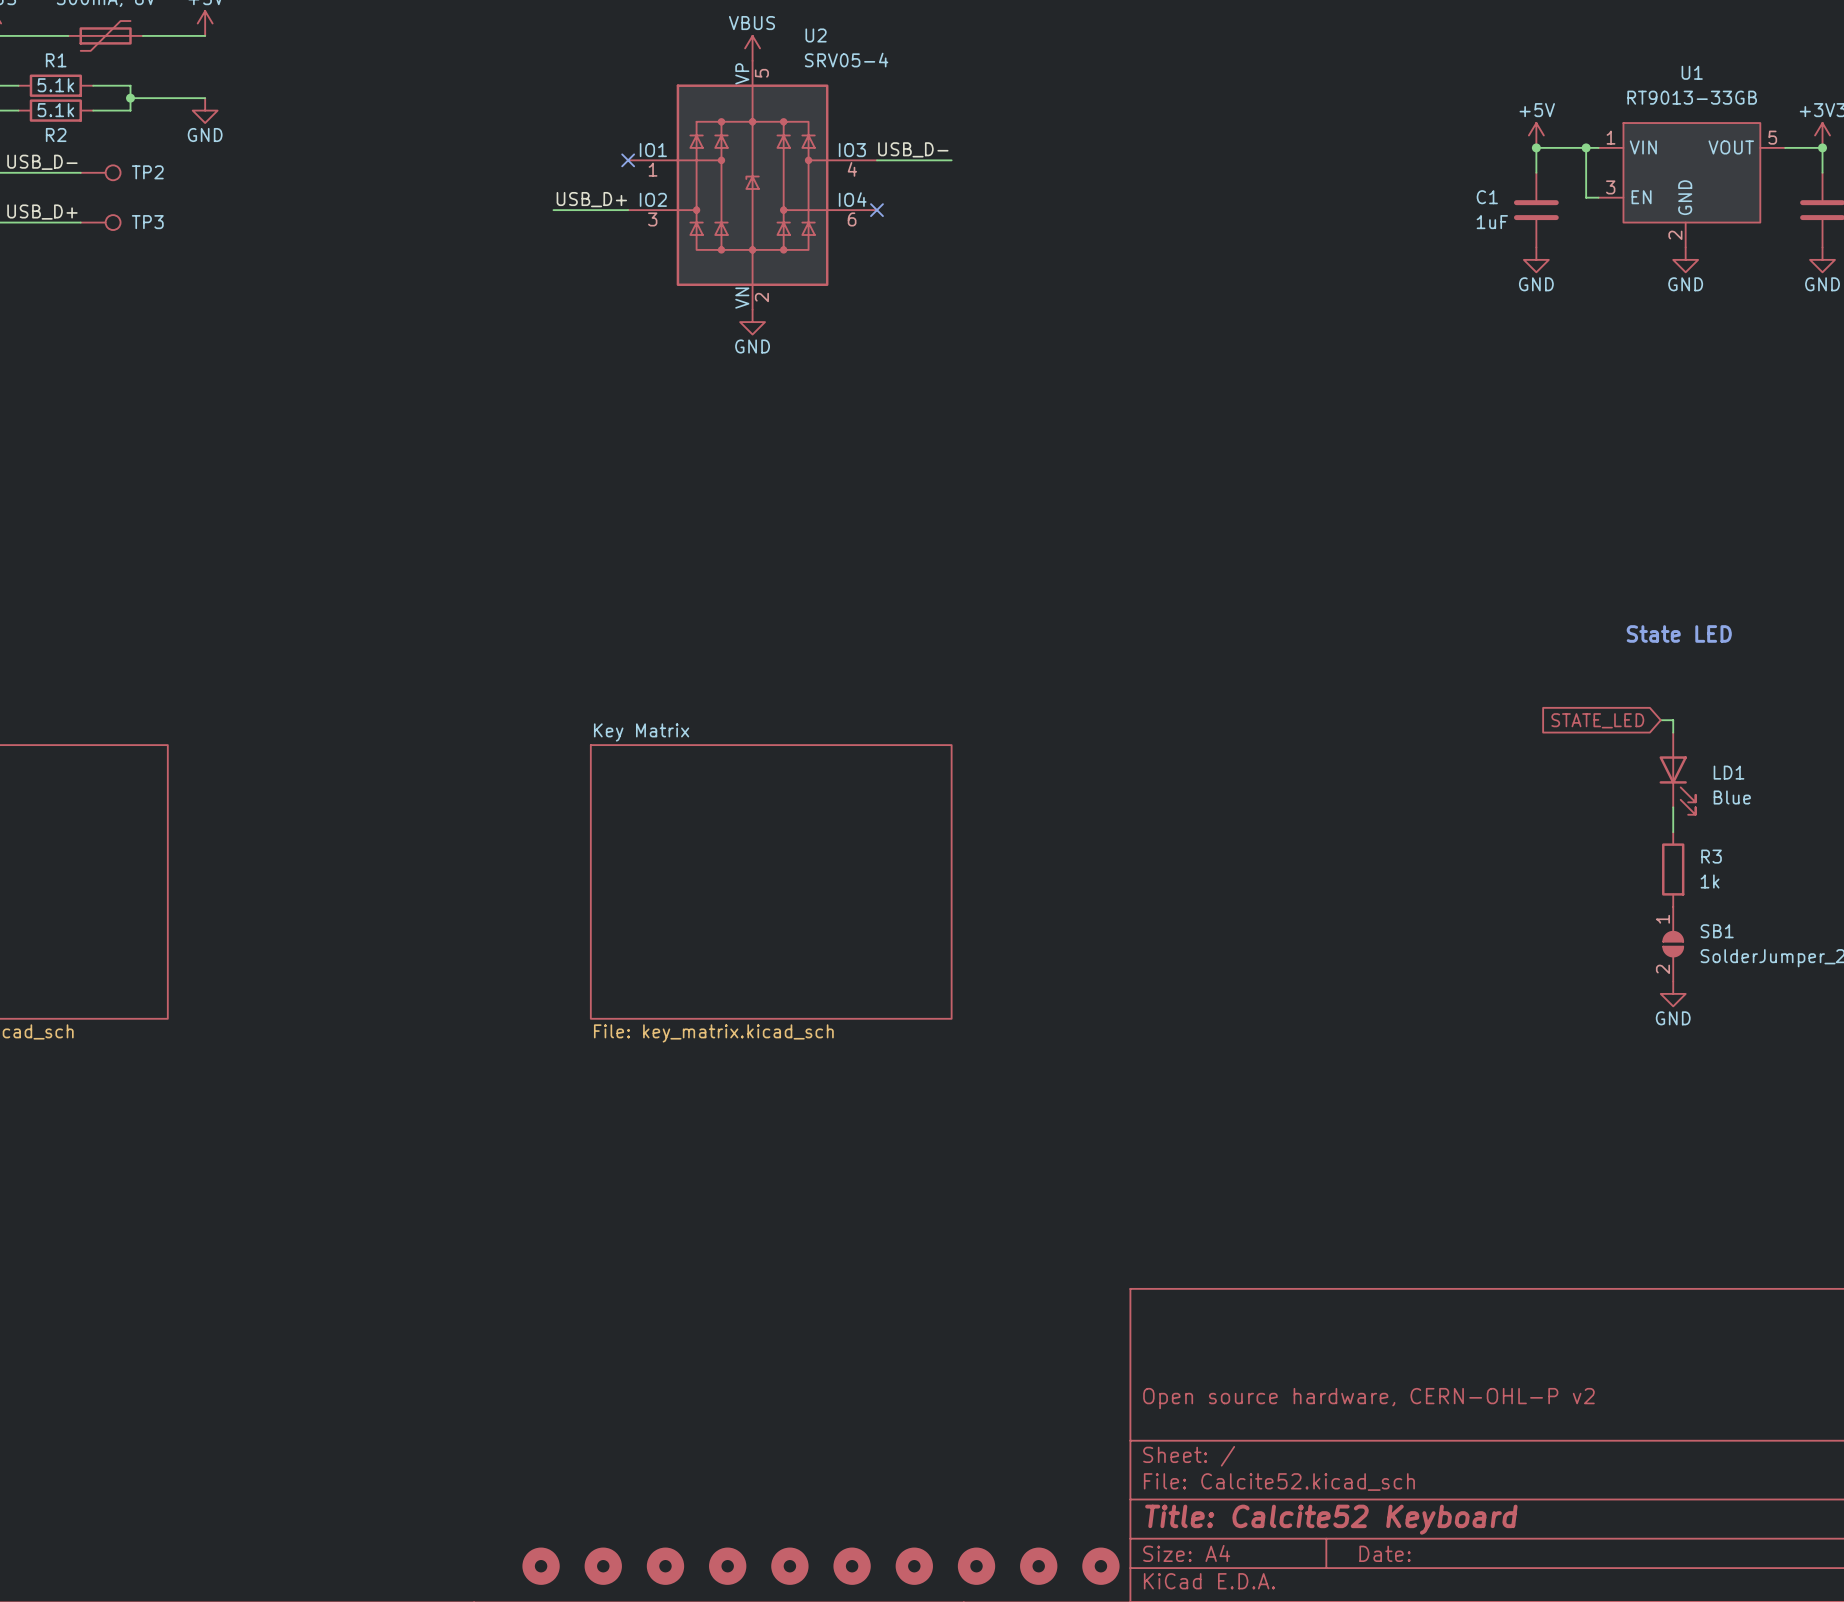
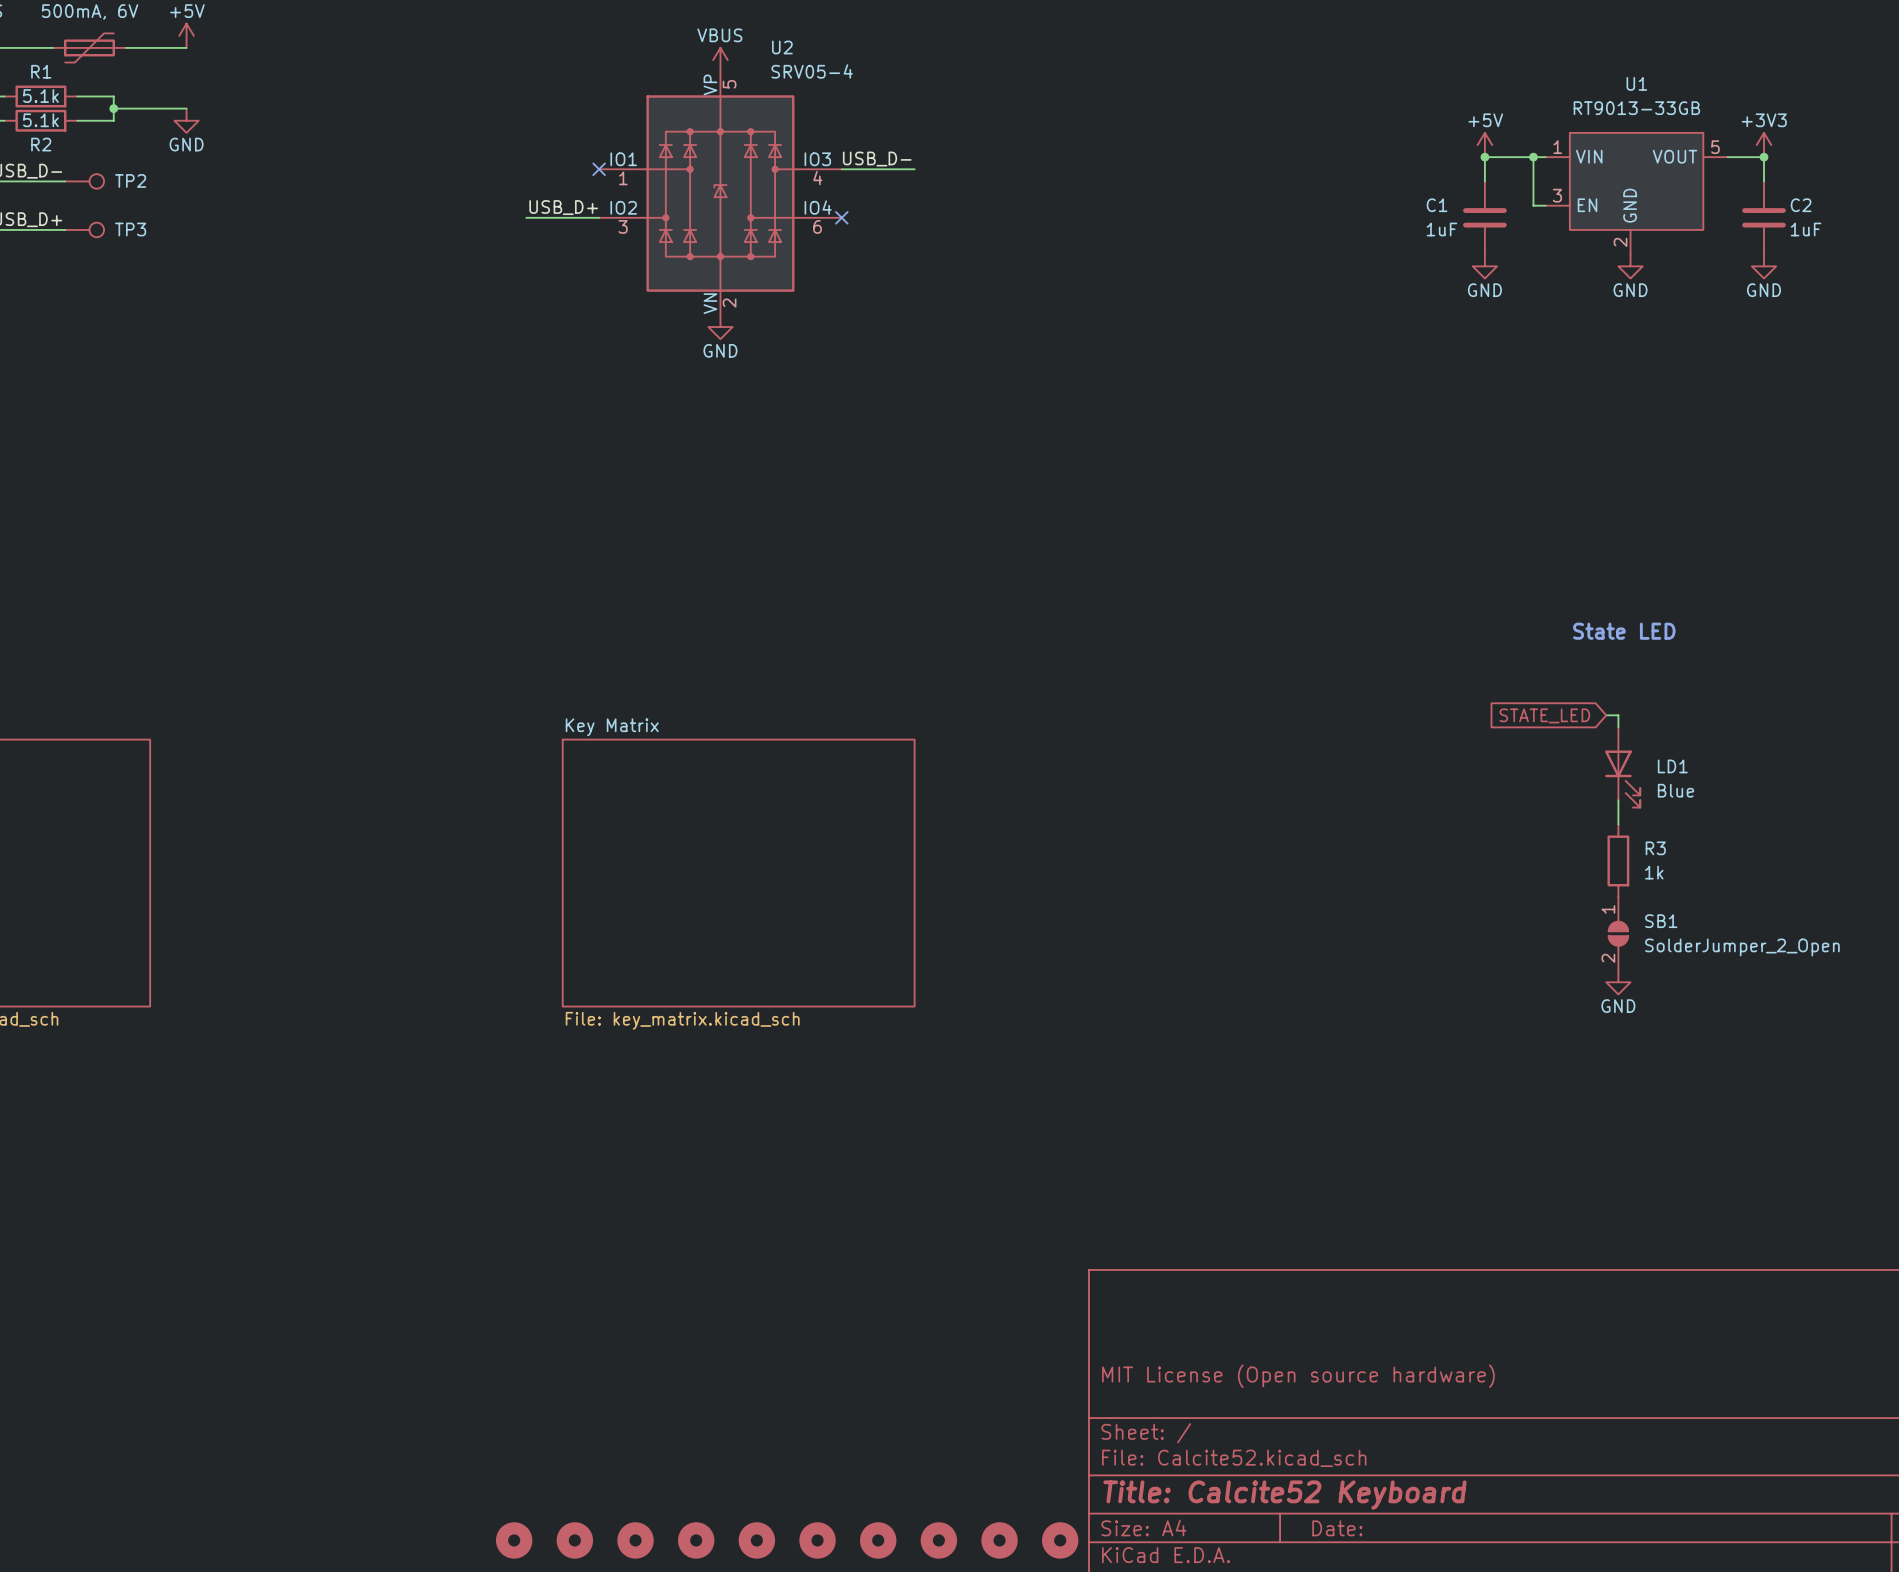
title block: Open source hardware, CERN-OHL-P v2 (1368, 1398) -> MIT License (Open source hardware) (1298, 1376)

